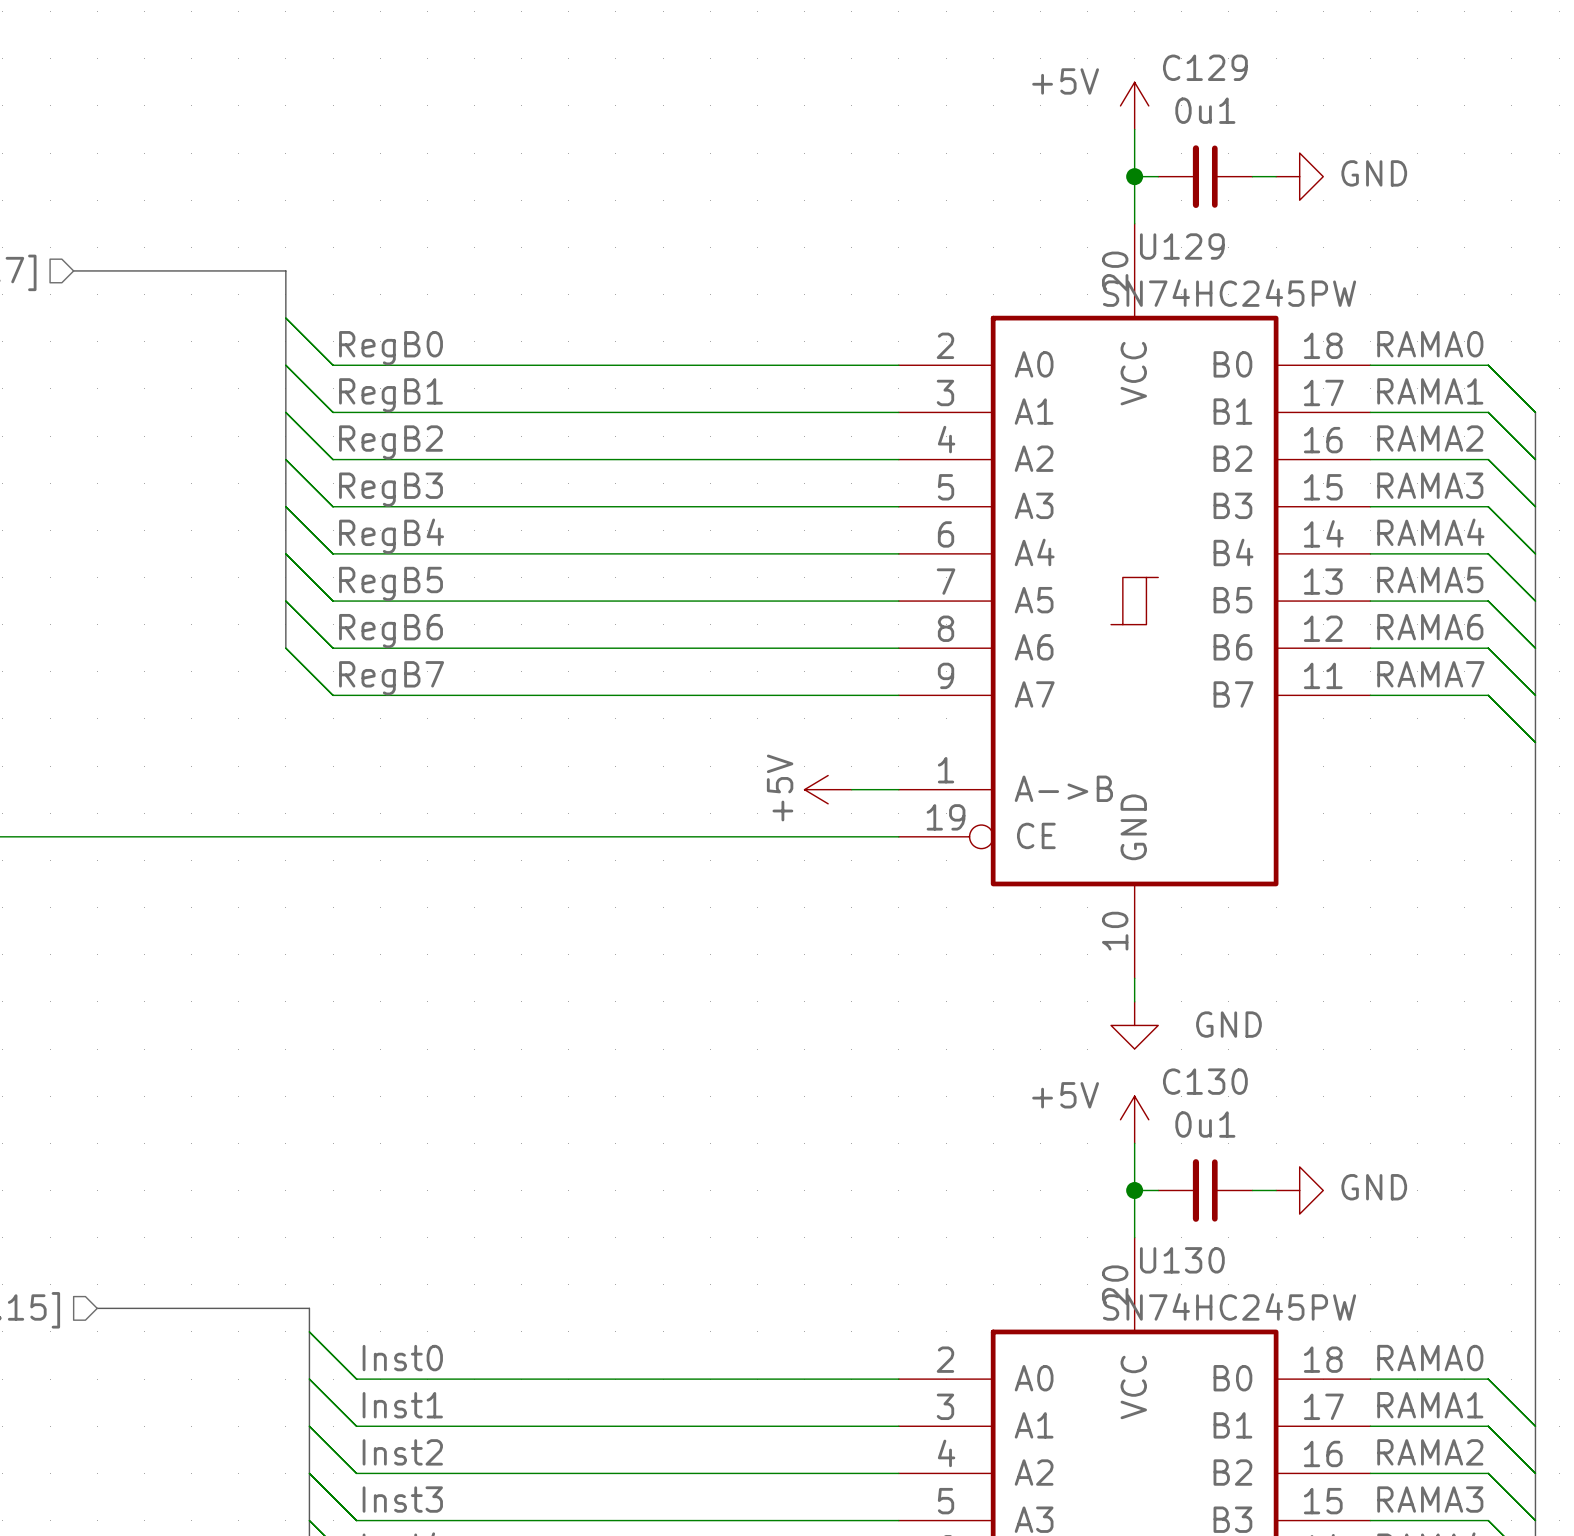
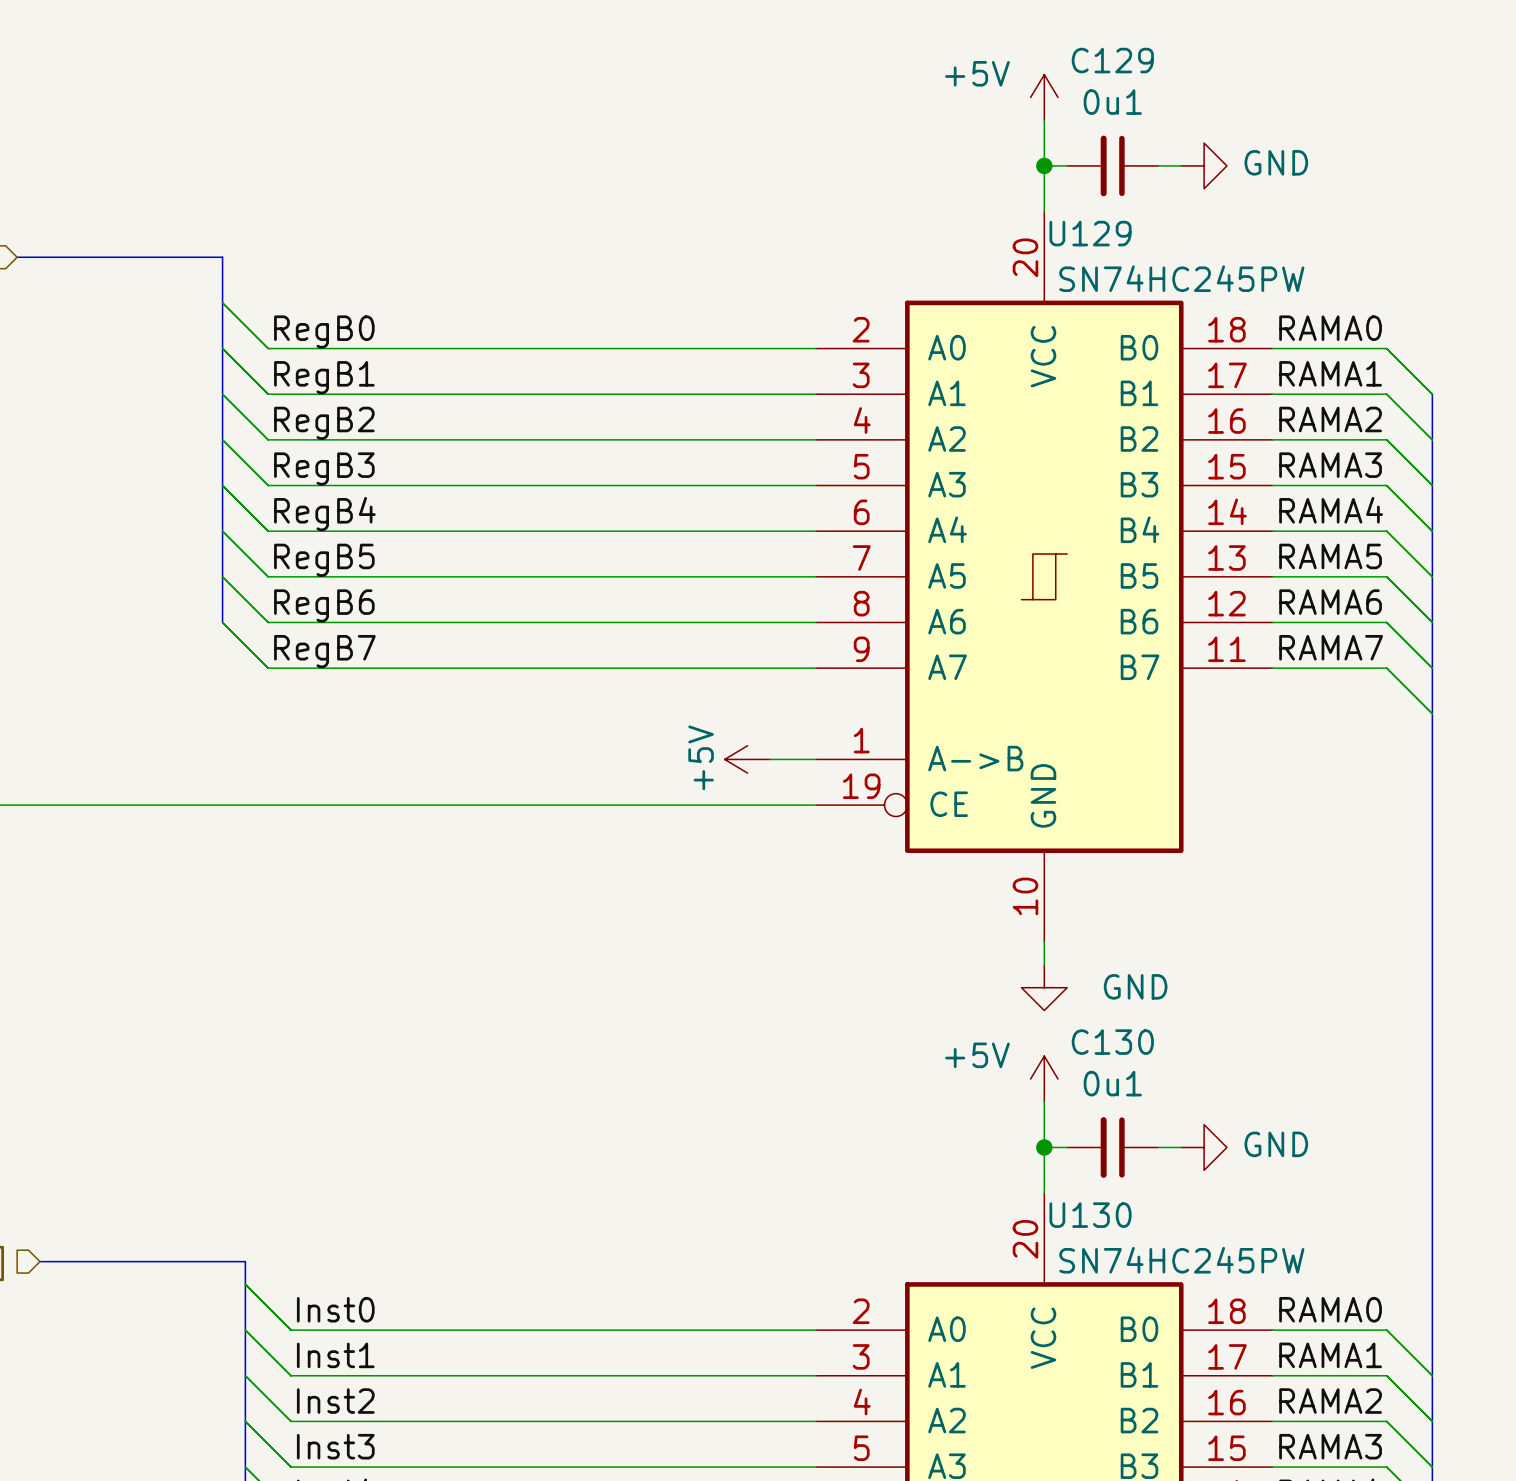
U129 value position: SN74HC245PW (1229, 293) -> SN74HC245PW (1181, 278)
U130 value position: SN74HC245PW (1229, 1306) -> SN74HC245PW (1181, 1260)

